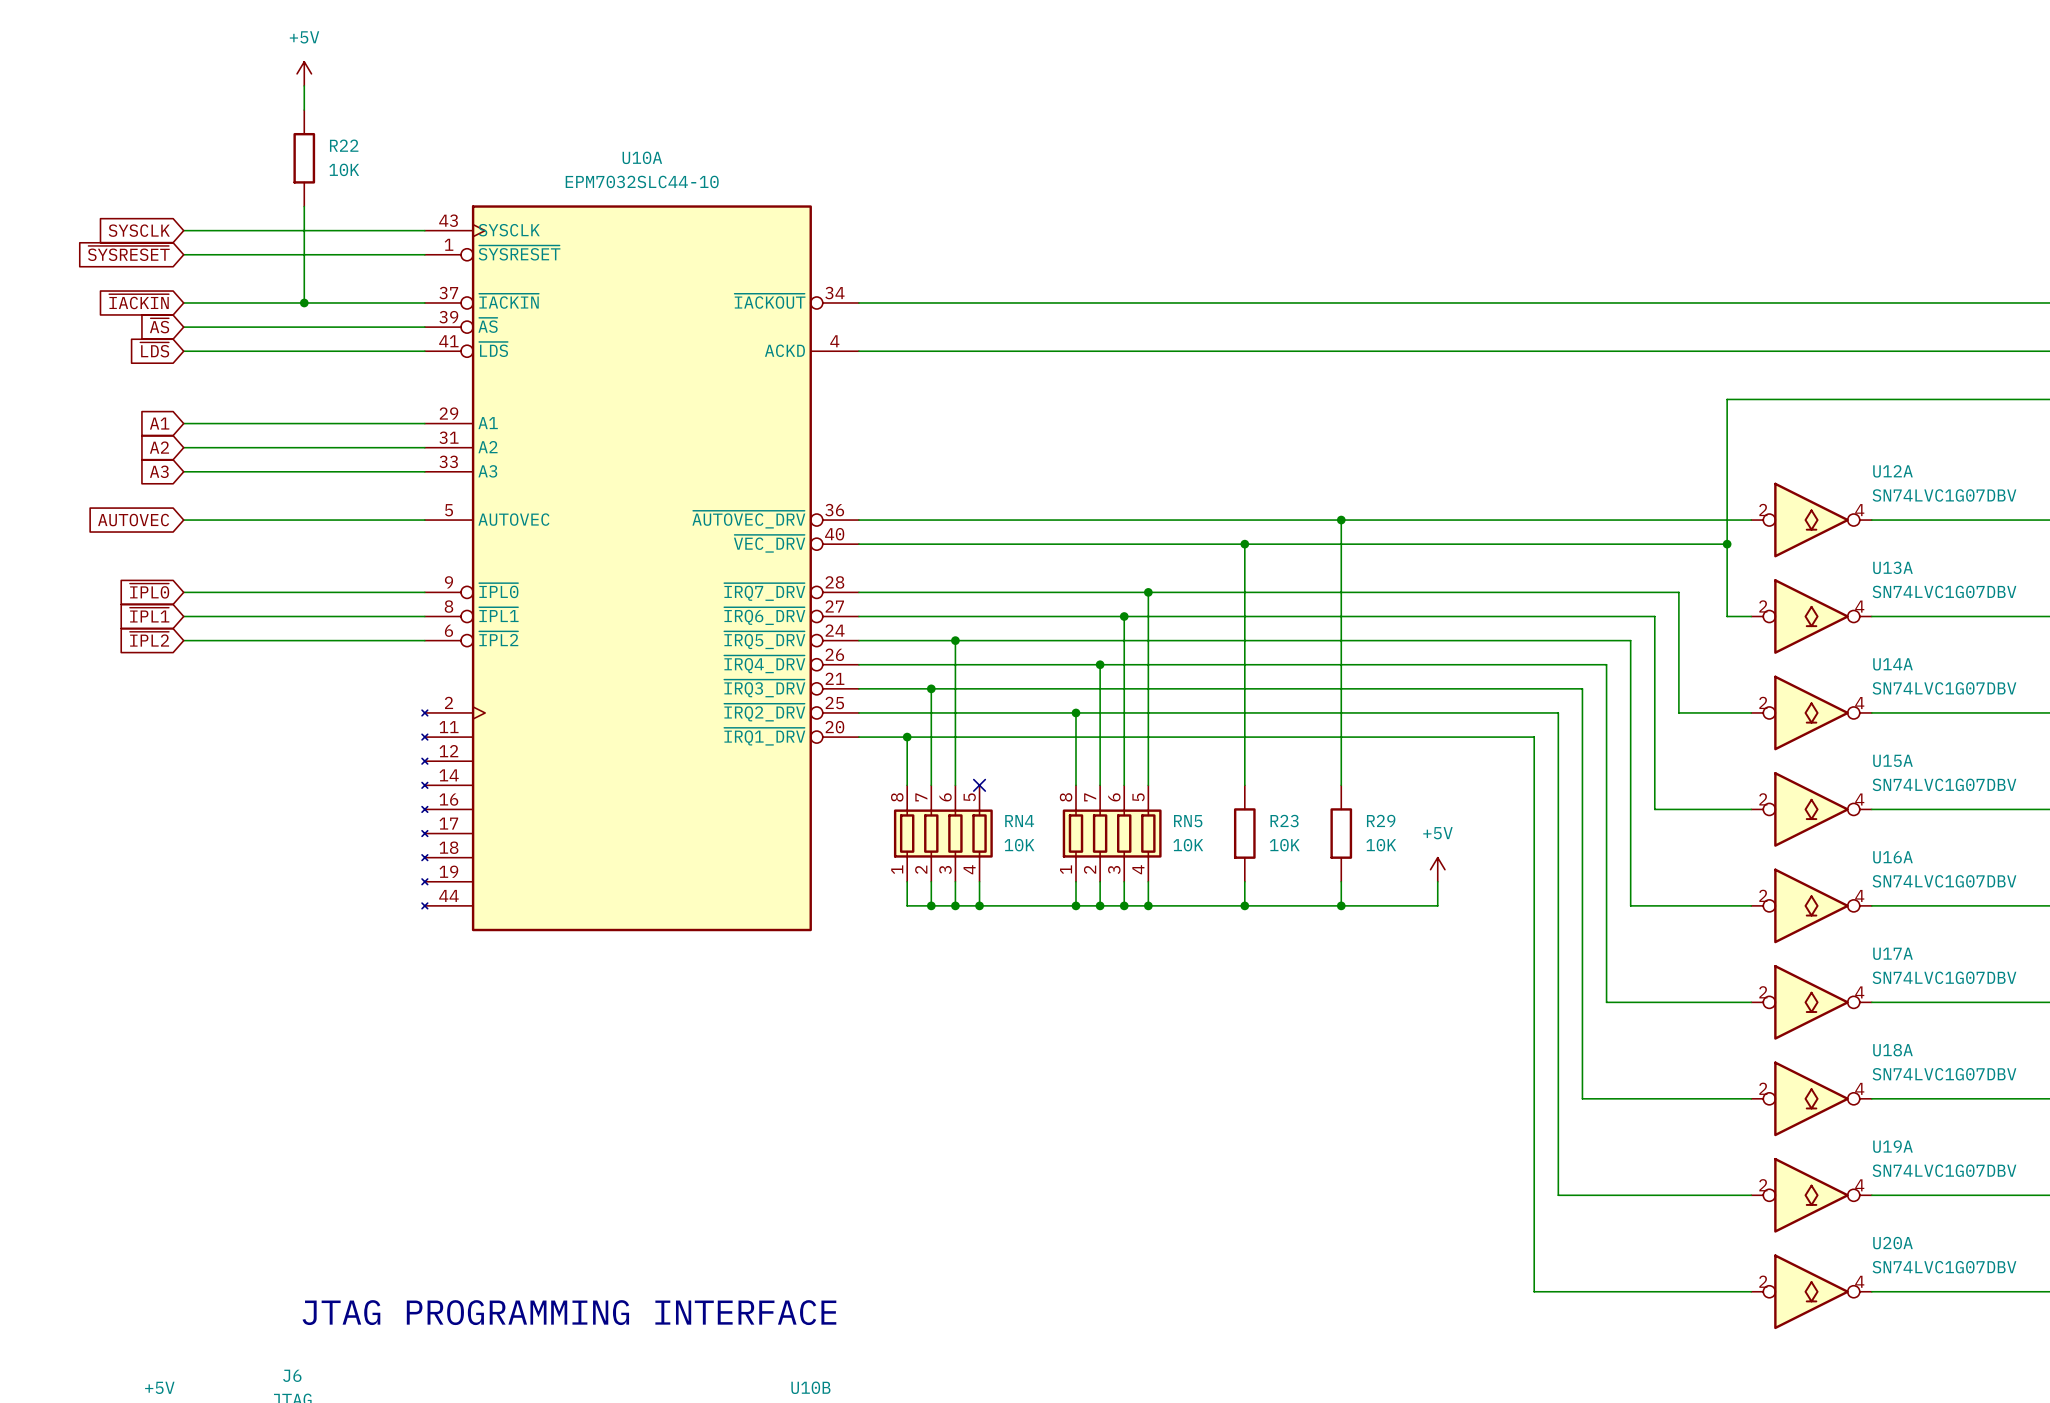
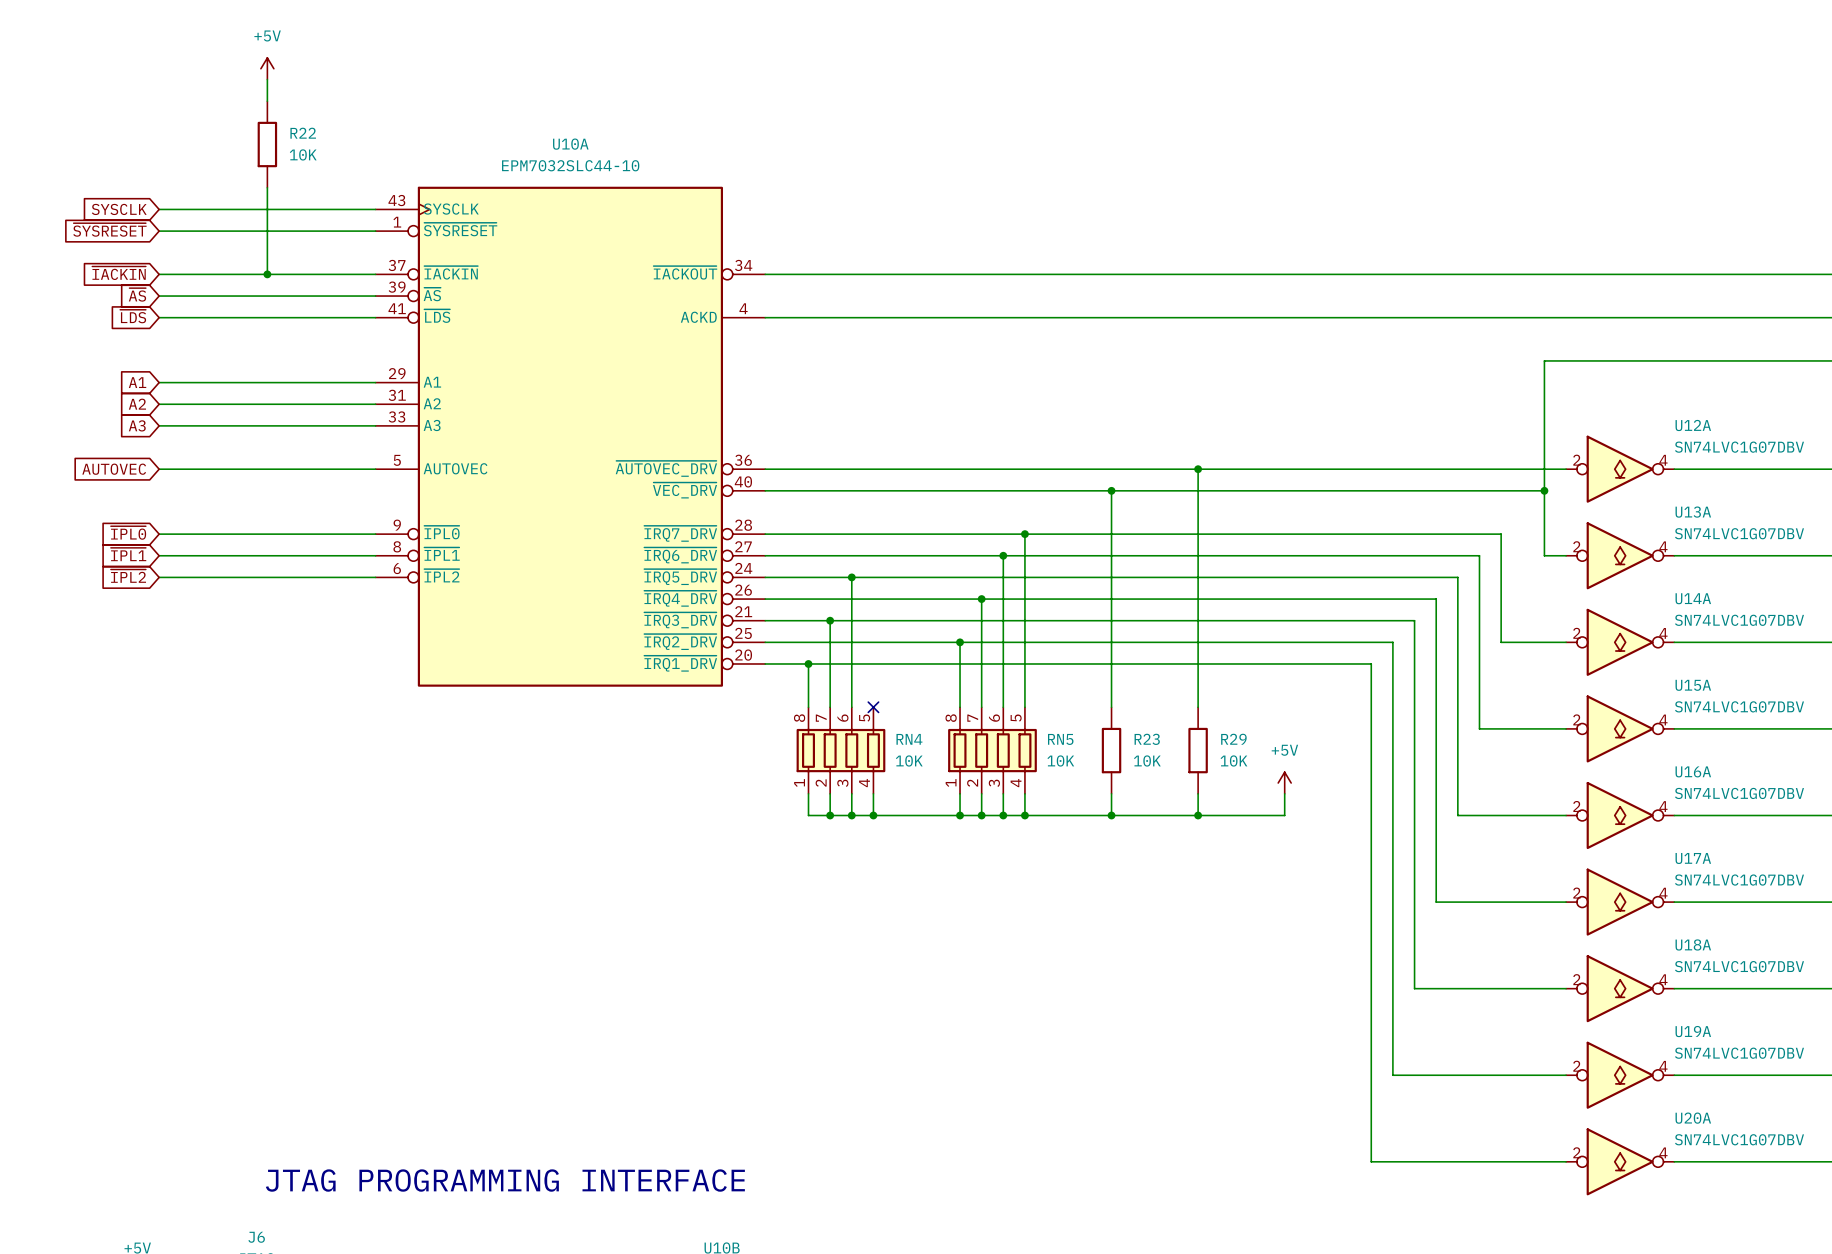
U10A symbol: [422, 205, 859, 932] -> [375, 186, 766, 687]

